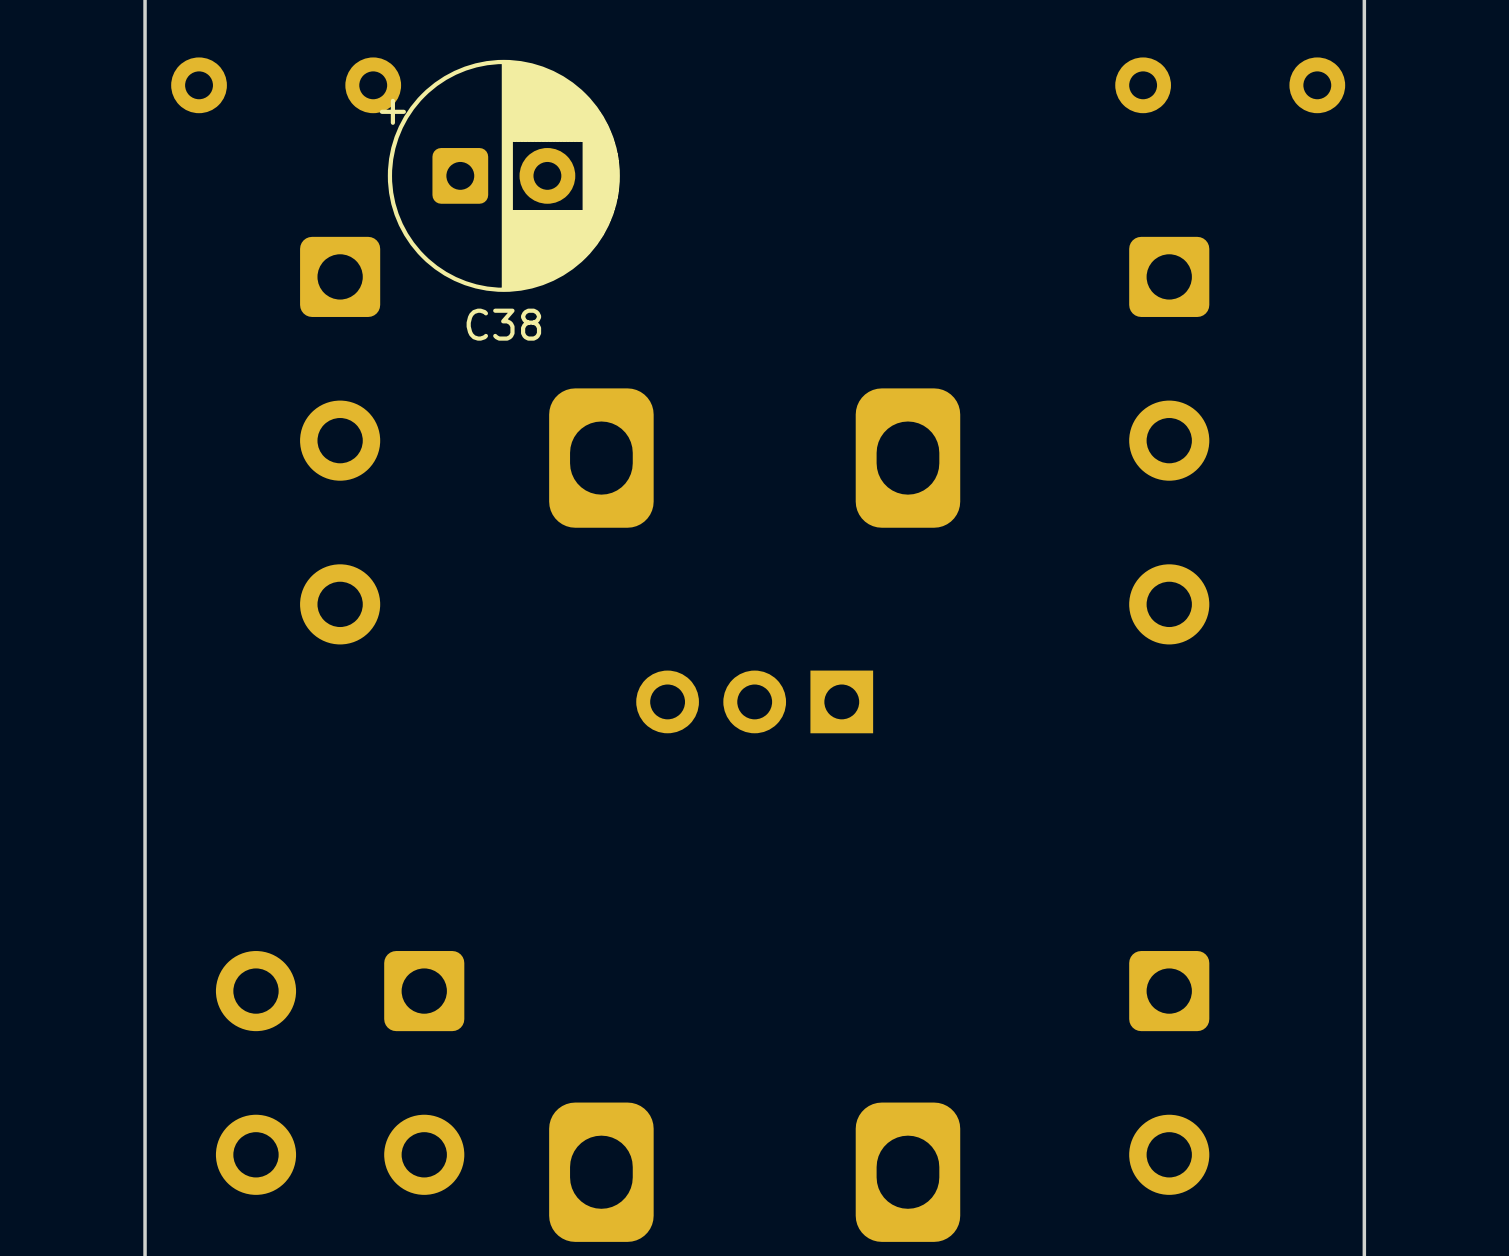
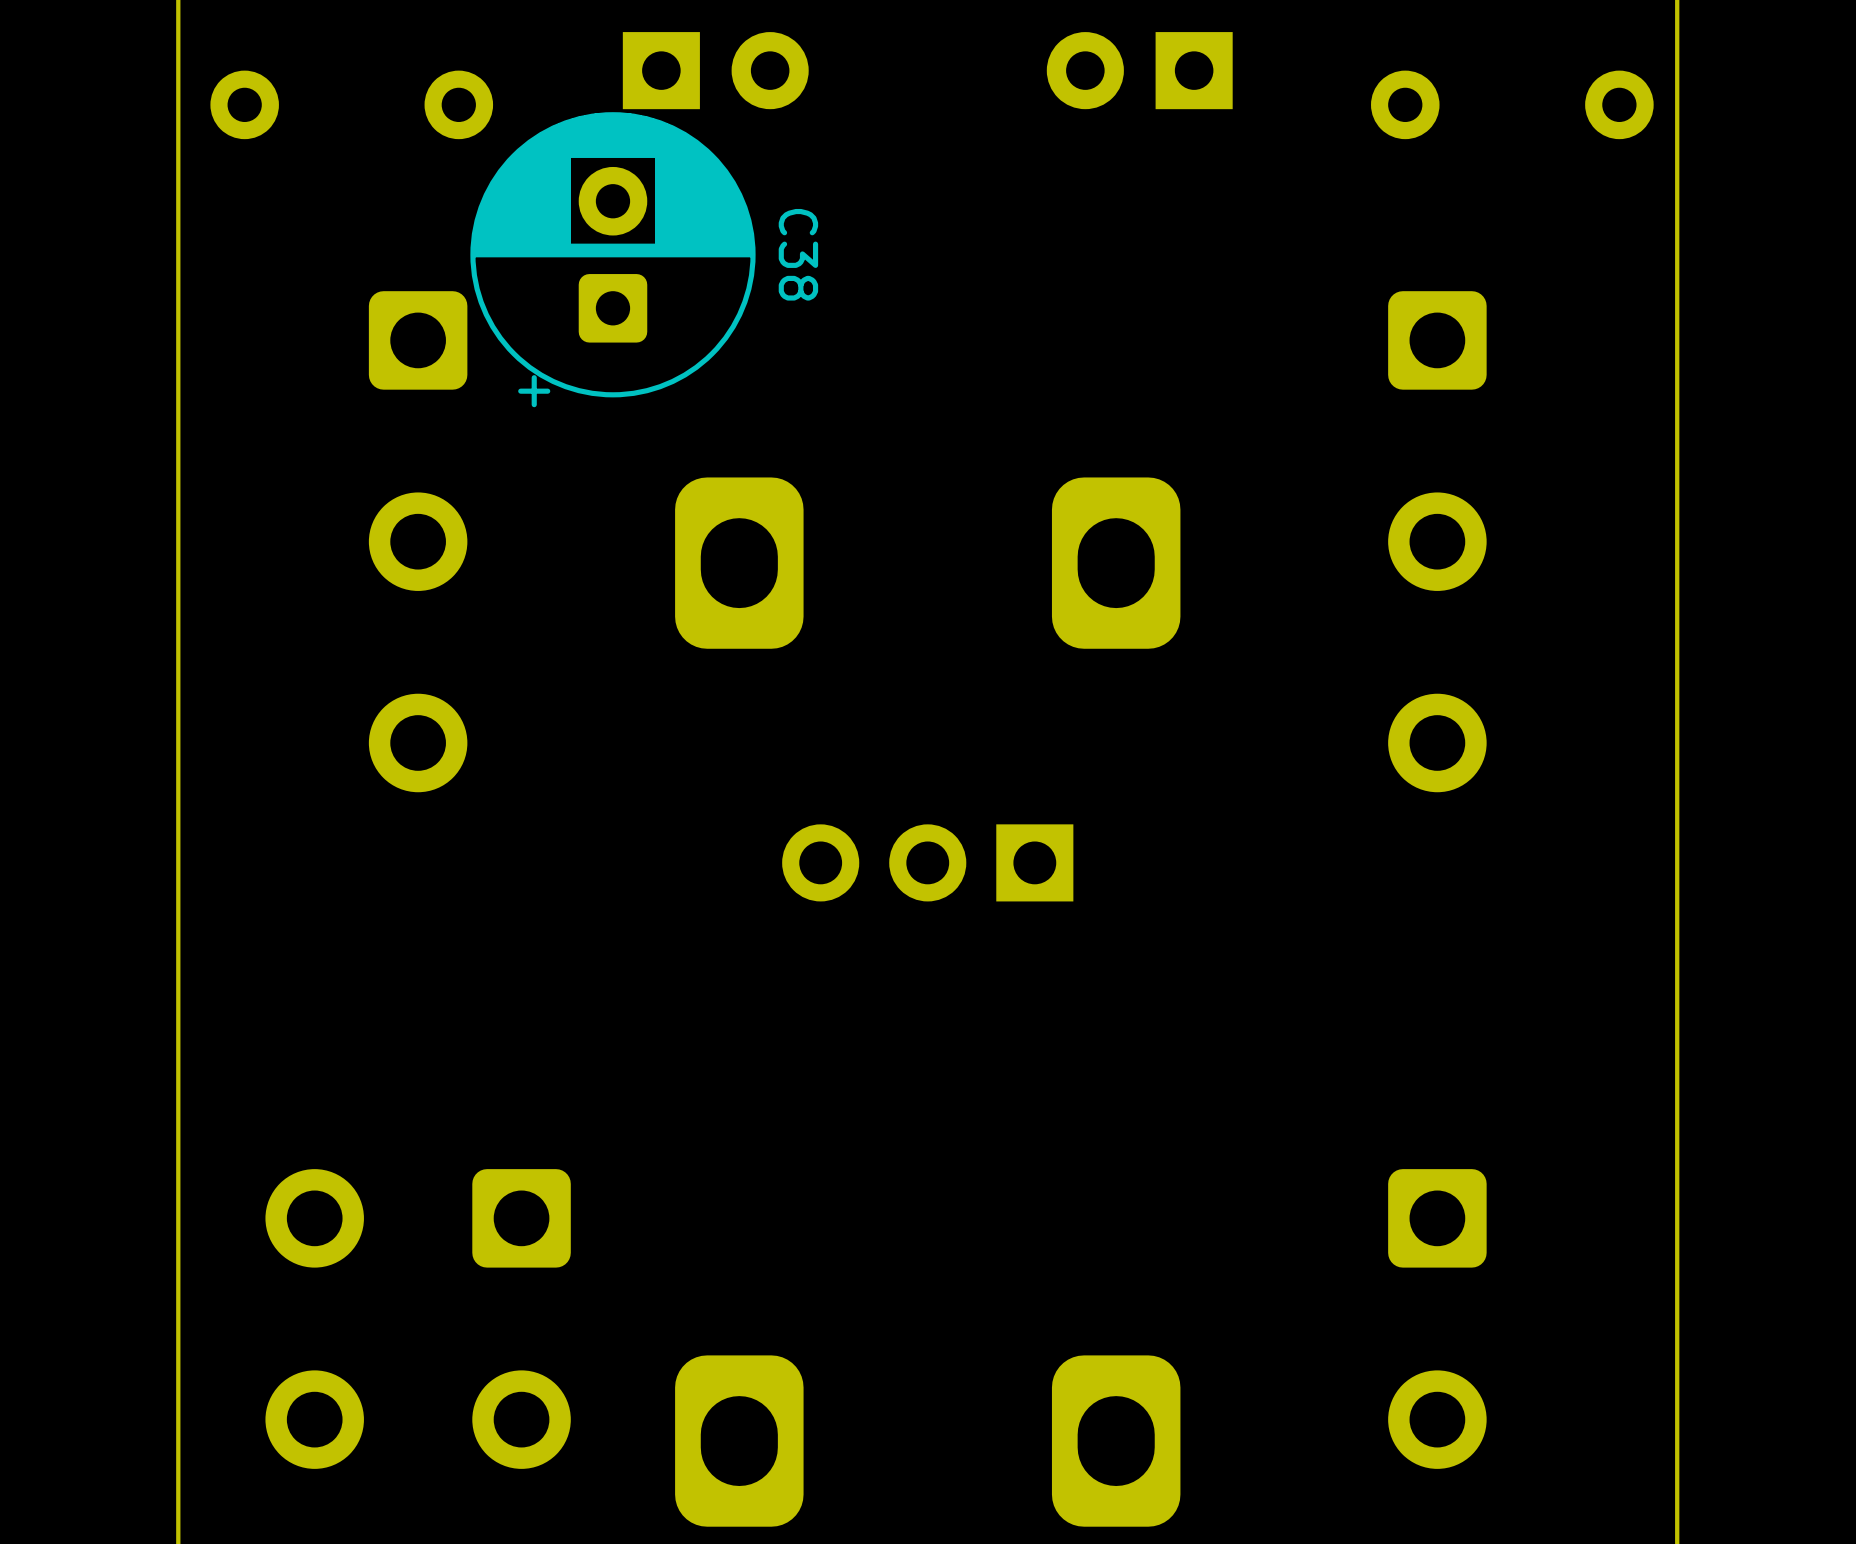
part: none -> (715, 70)
part: none -> (1139, 70)
C38 rotation: 0° (499, 175) -> 90° counterclockwise (612, 259)

